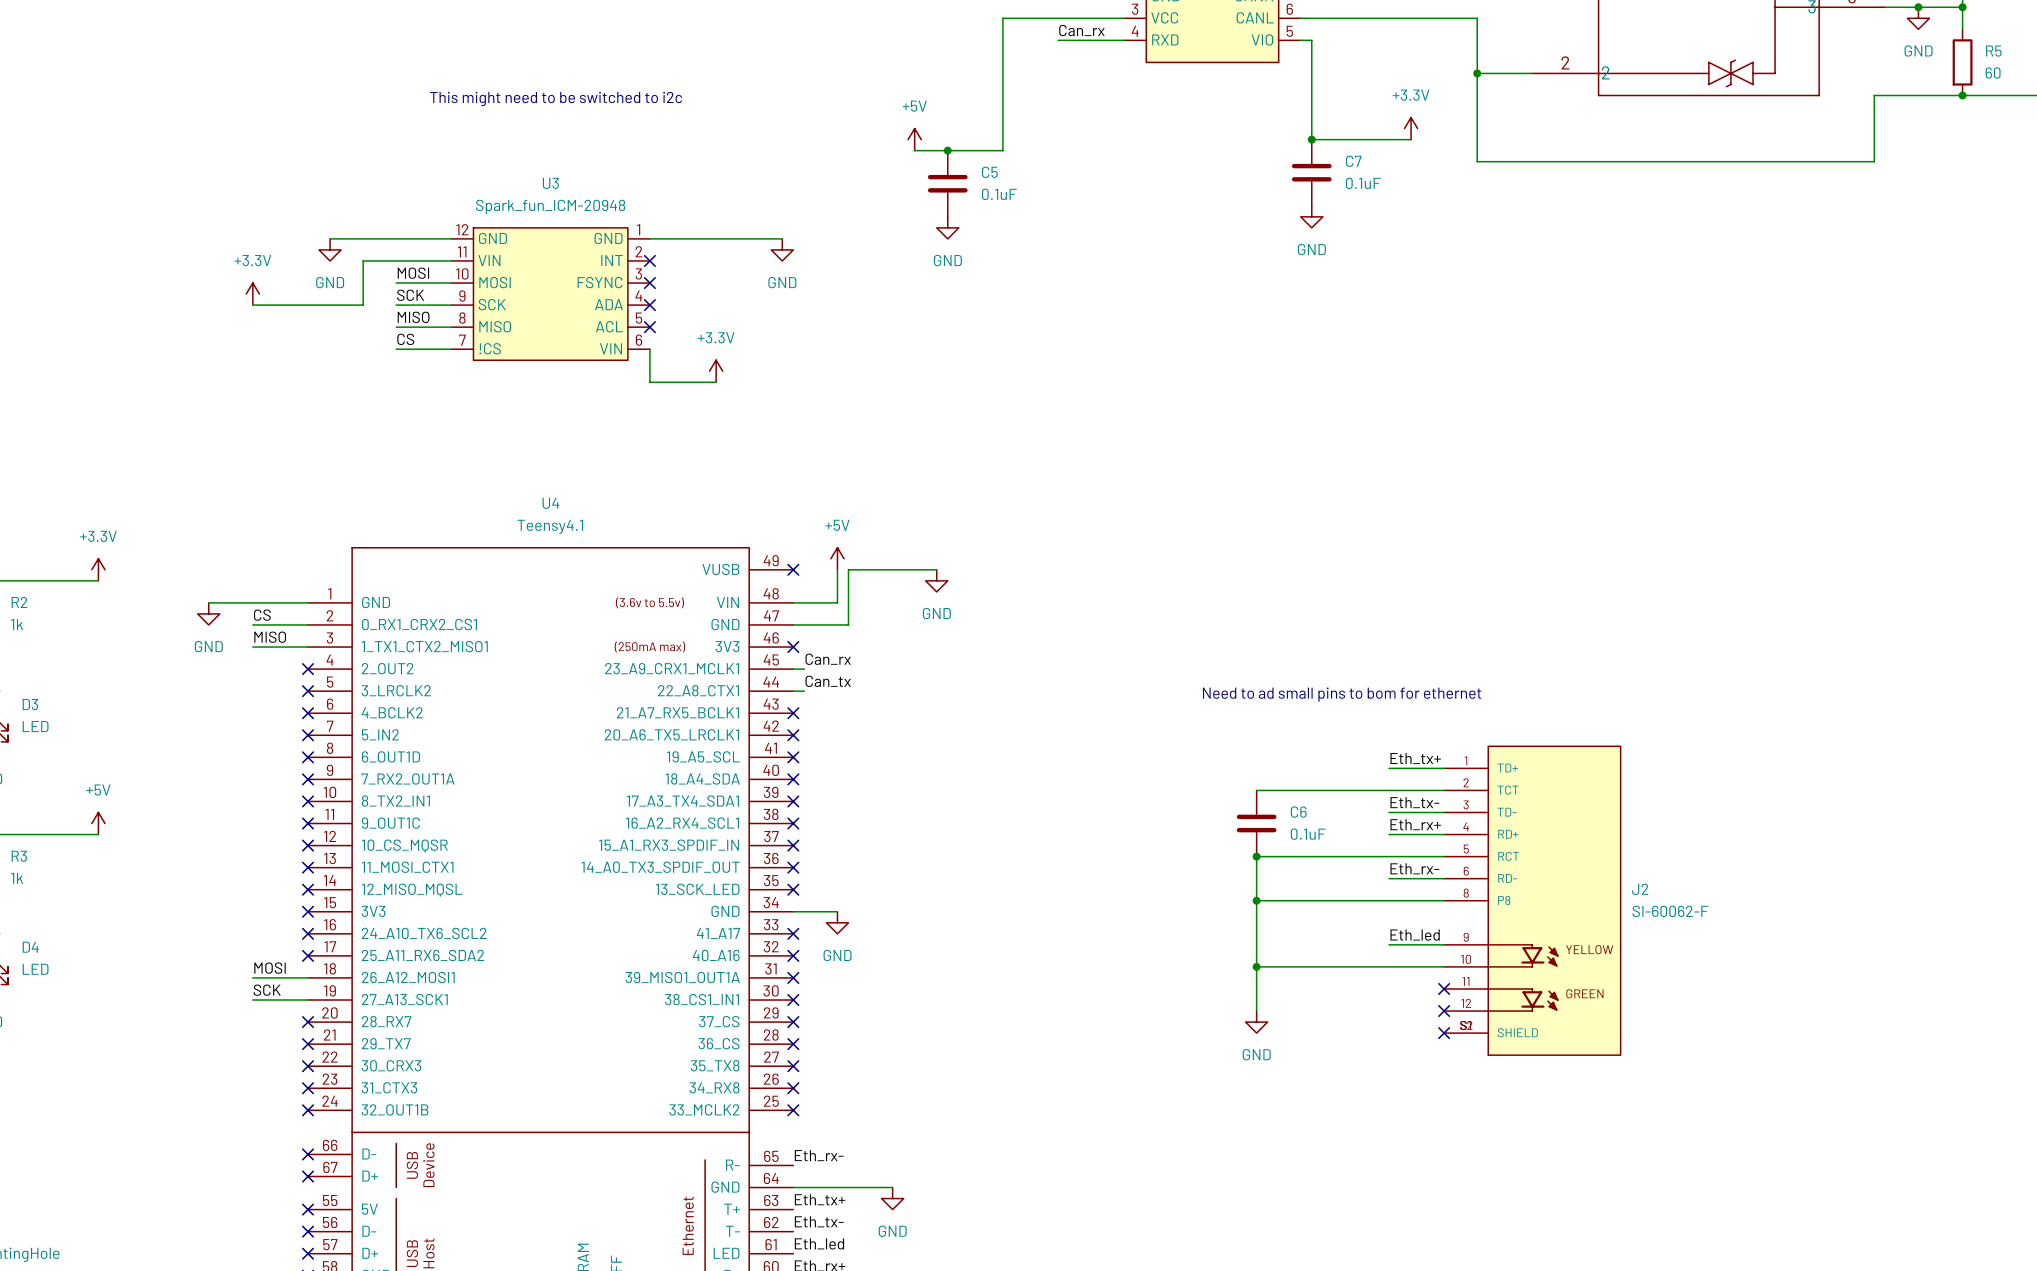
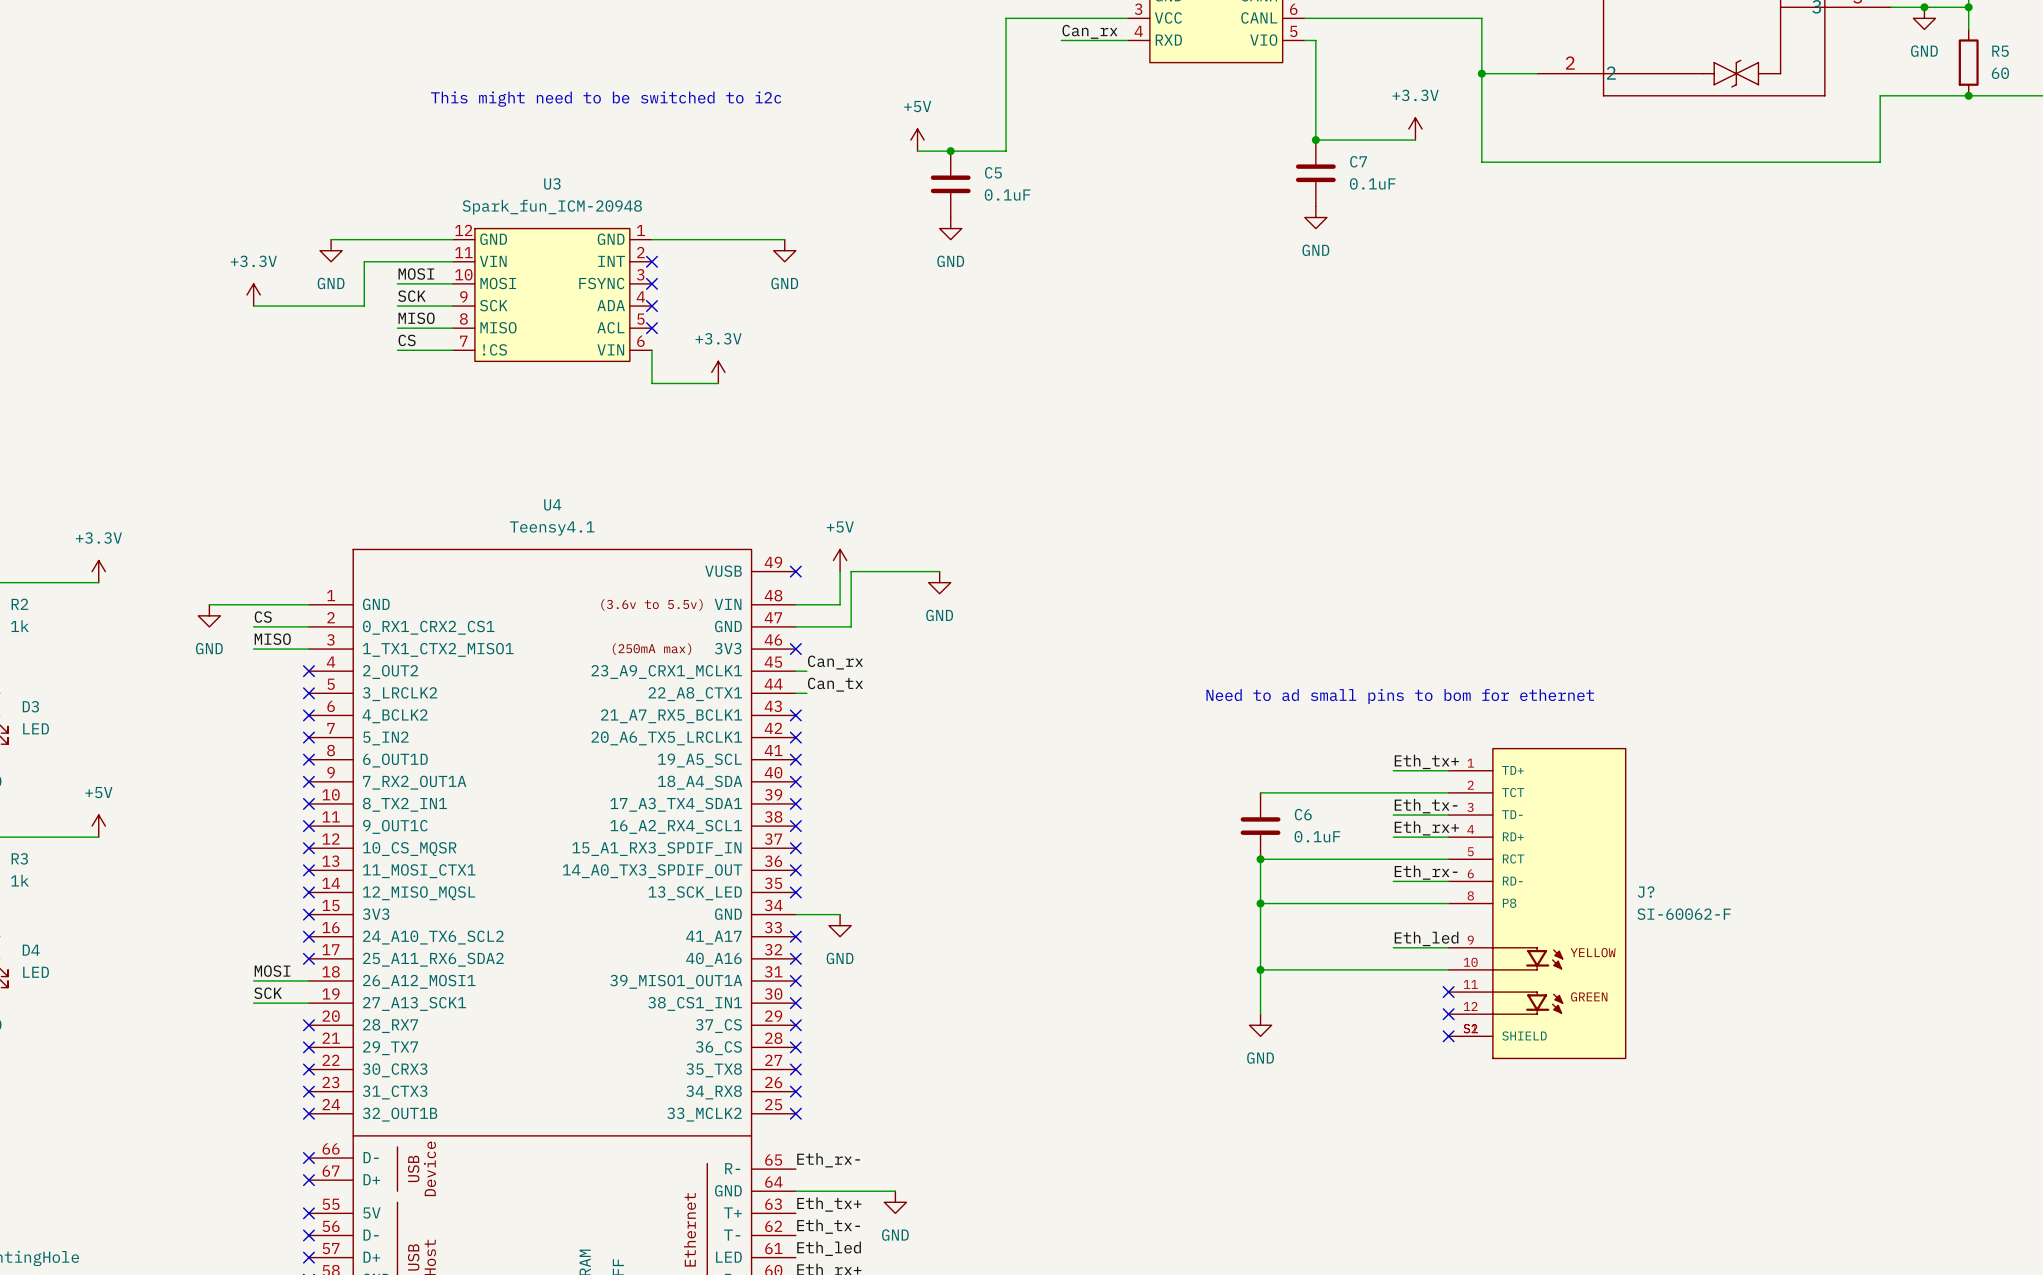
J2 name: J2 (1640, 889) -> J? (1646, 892)

